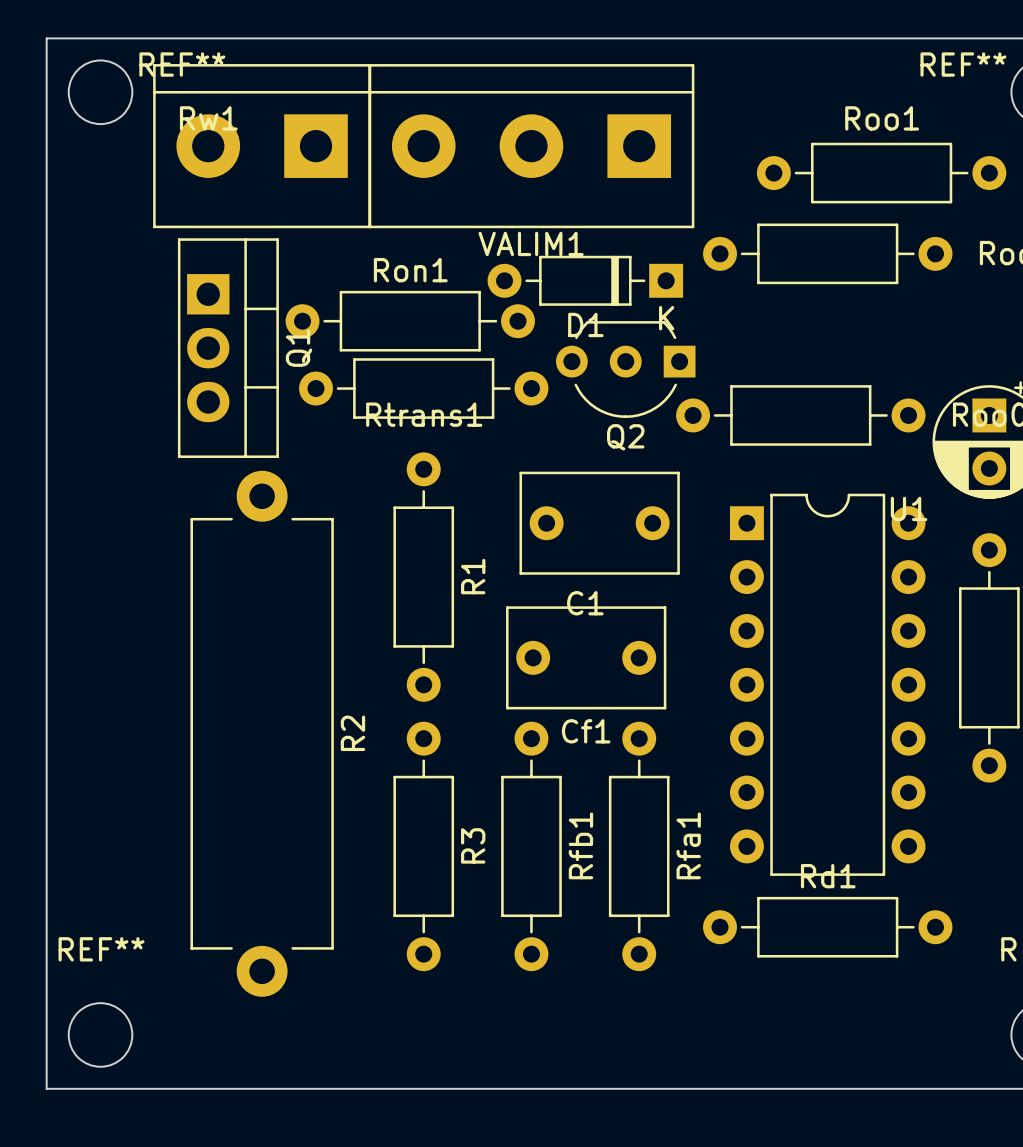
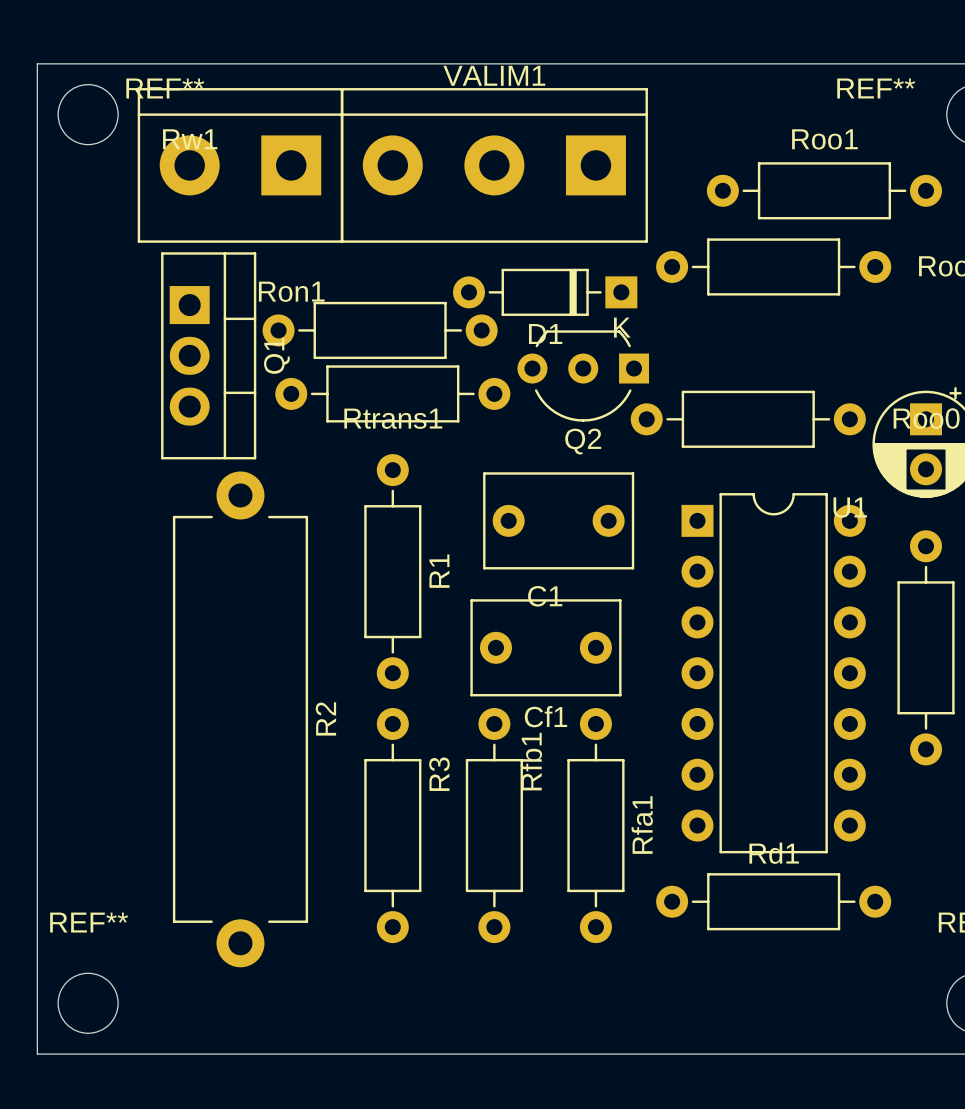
REF** name position: REF** (963, 64) -> REF** (876, 88)
VALIM1 name position: VALIM1 (531, 243) -> VALIM1 (494, 75)
Ron1 name position: Ron1 (410, 270) -> Ron1 (291, 291)
R3 name position: R3 (473, 845) -> R3 (439, 774)
Rfb1 name position: Rfb1 (580, 845) -> Rfb1 (531, 761)

